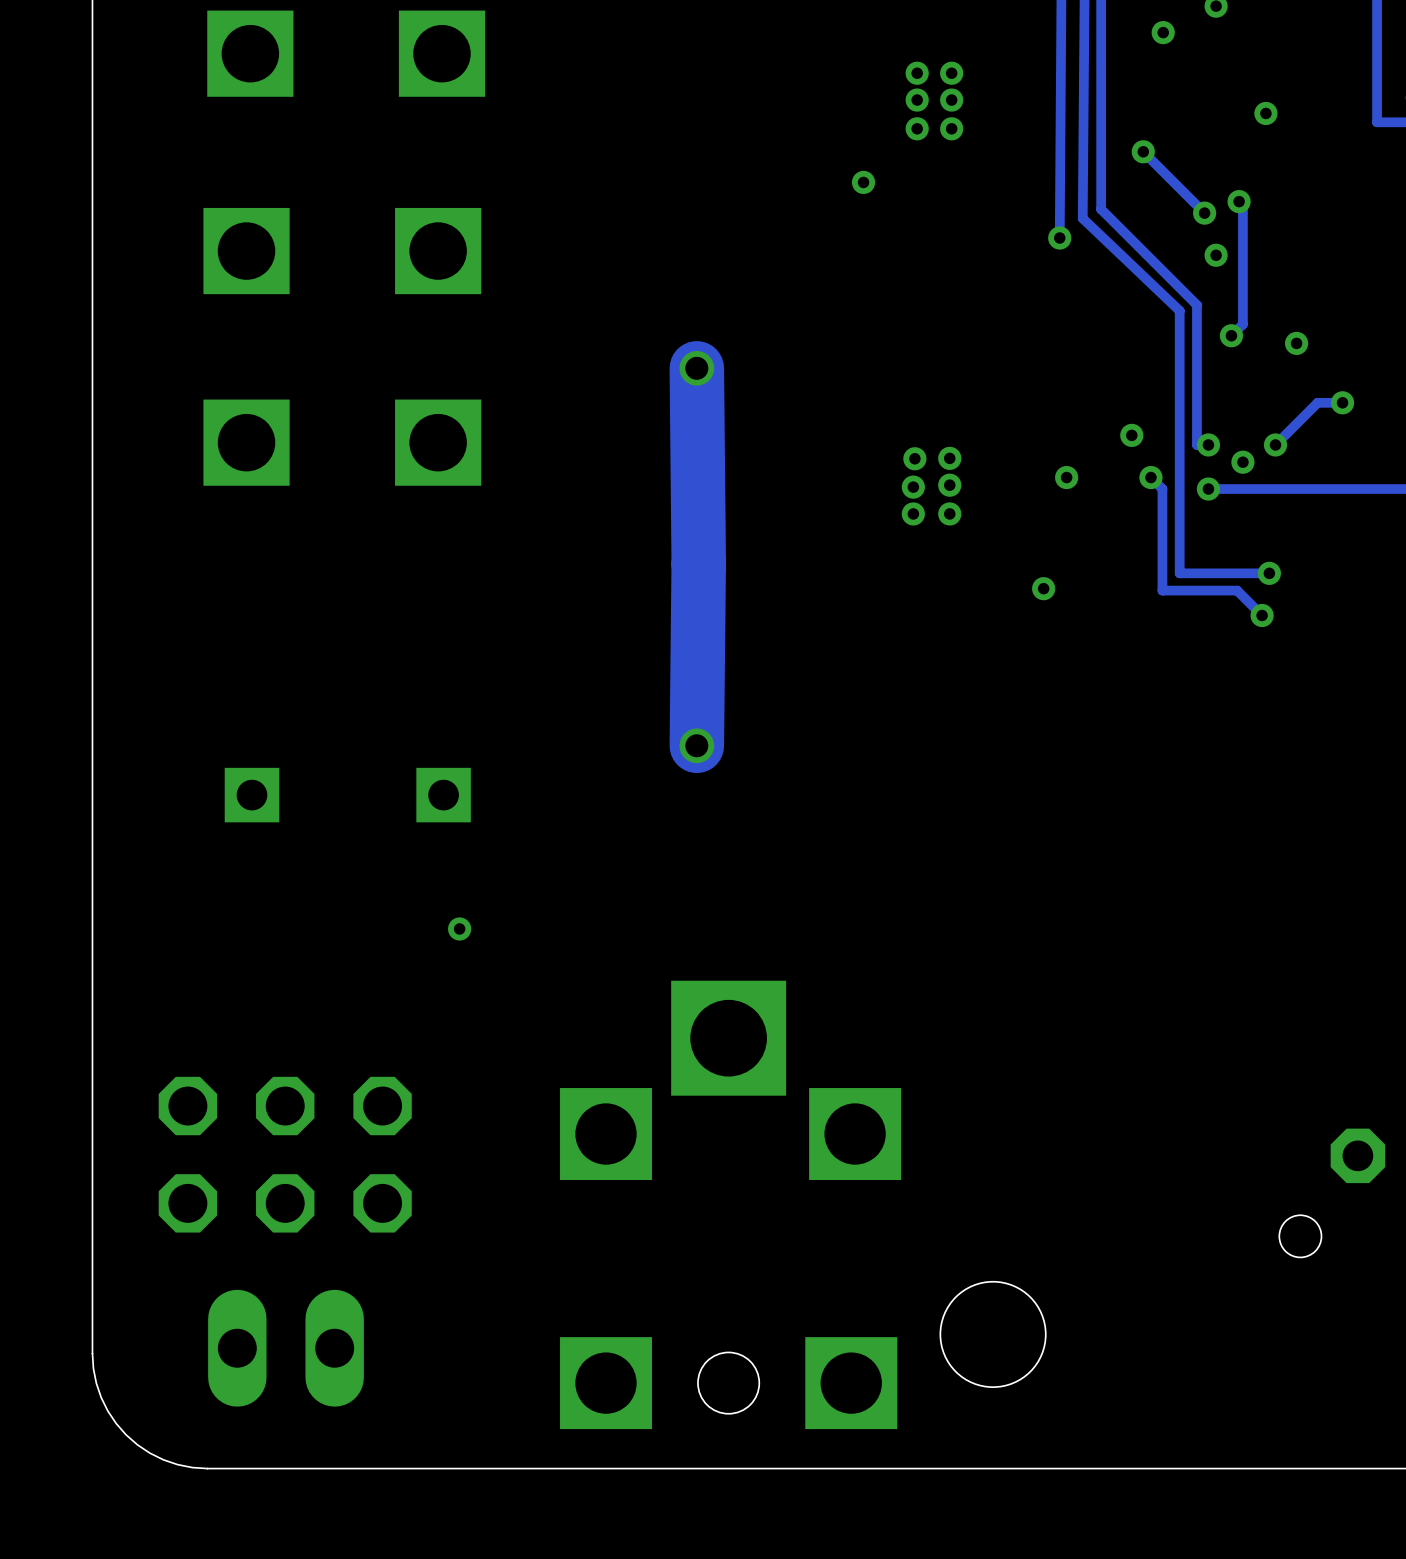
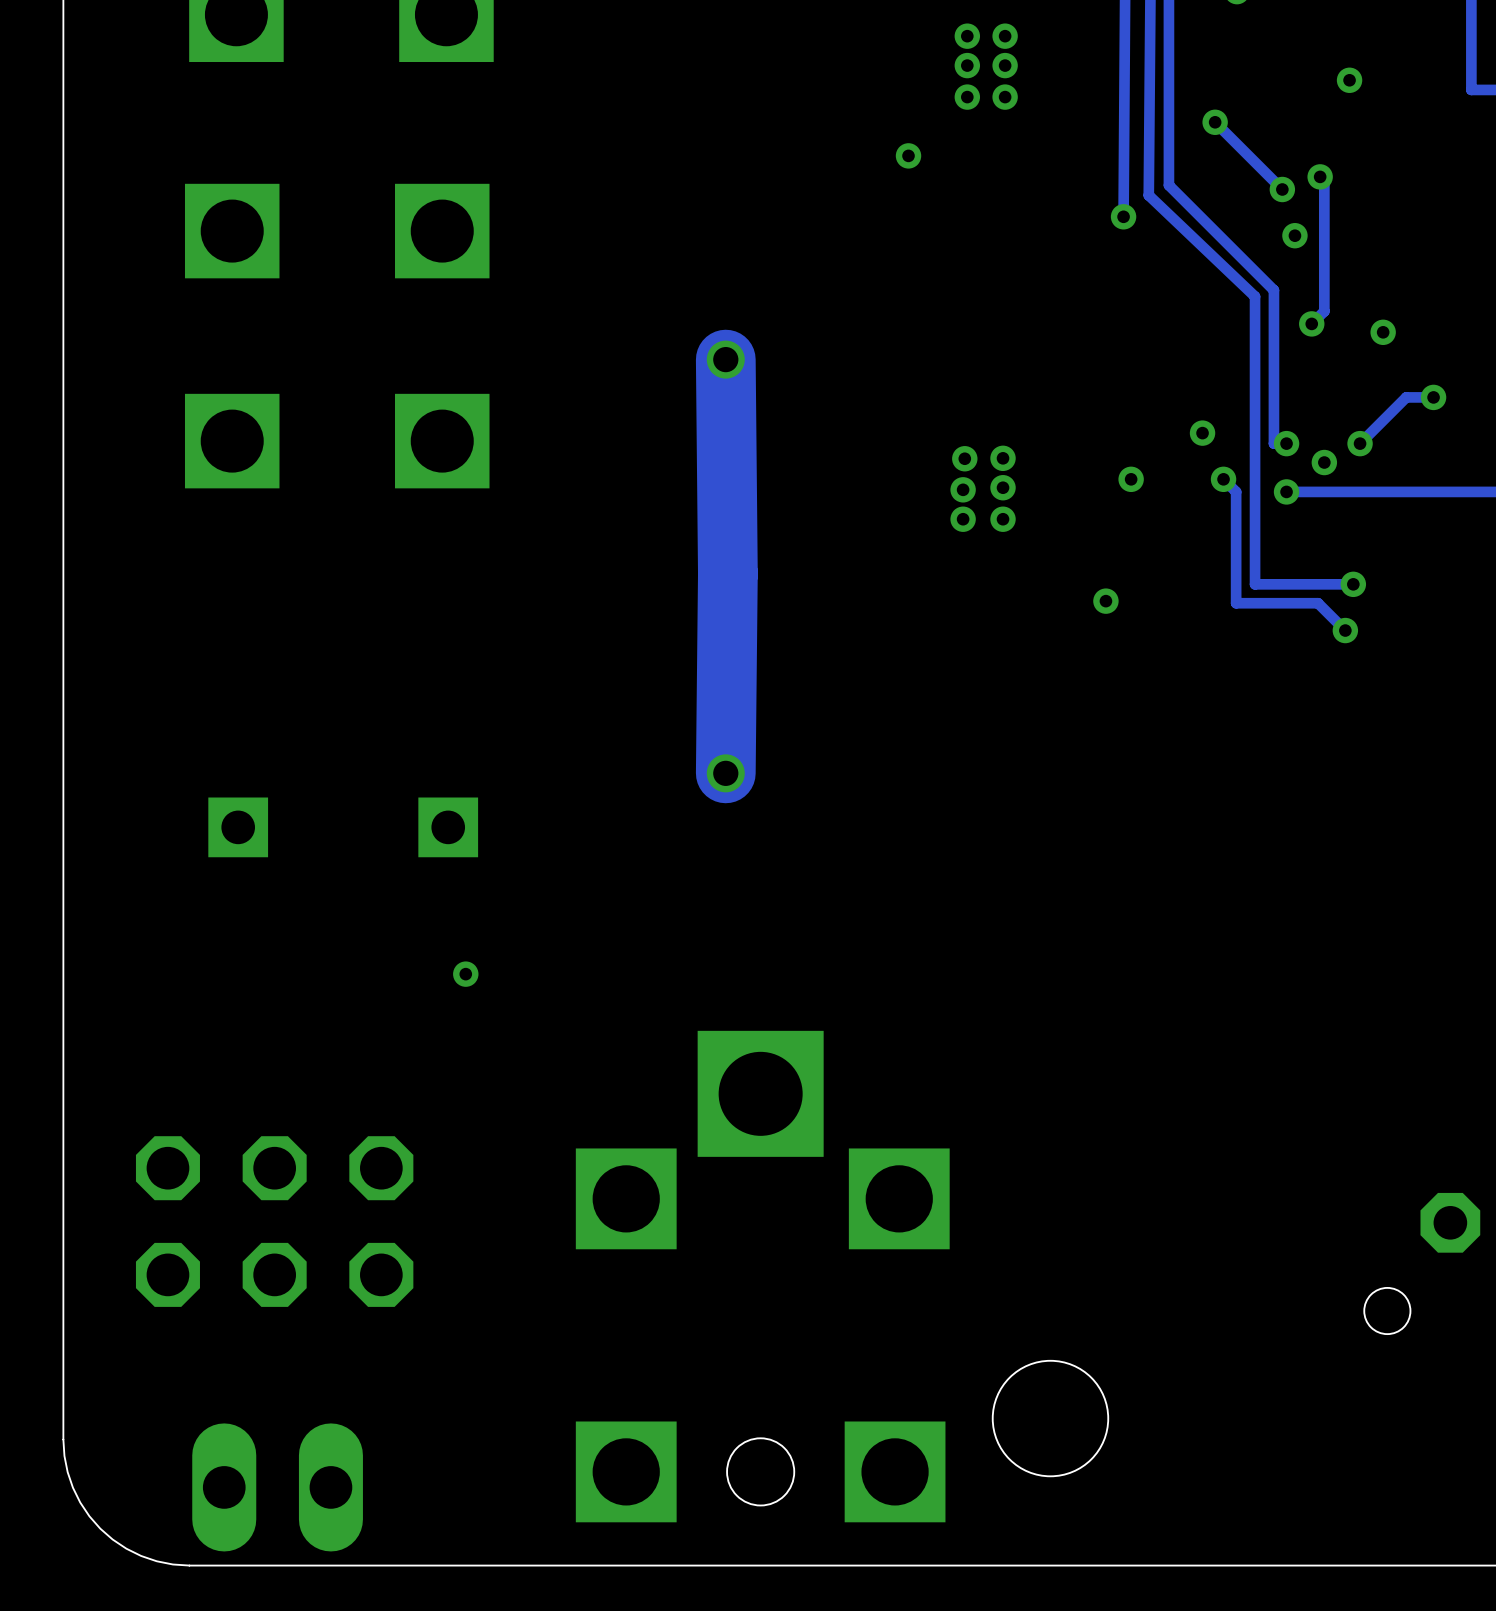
part position: (286, 1348) -> (277, 1487)

